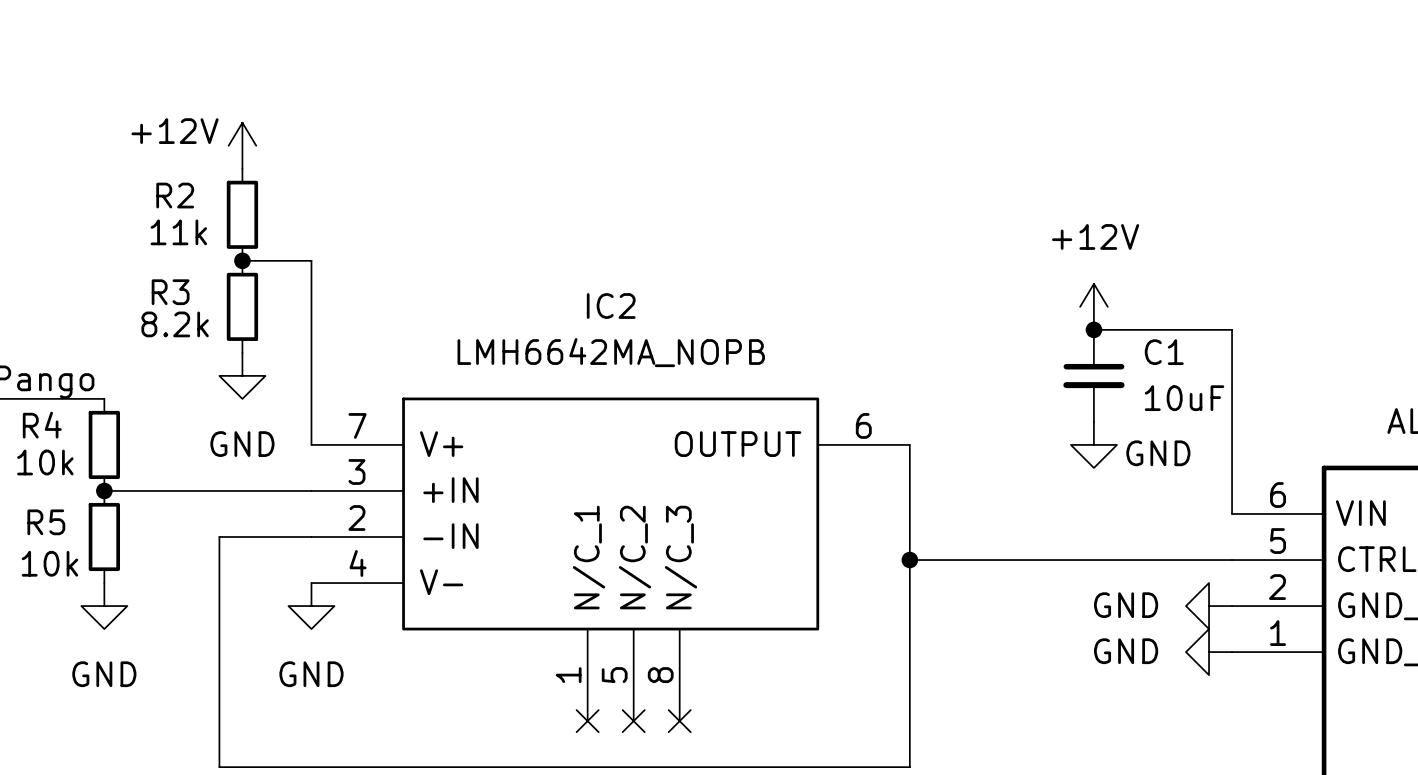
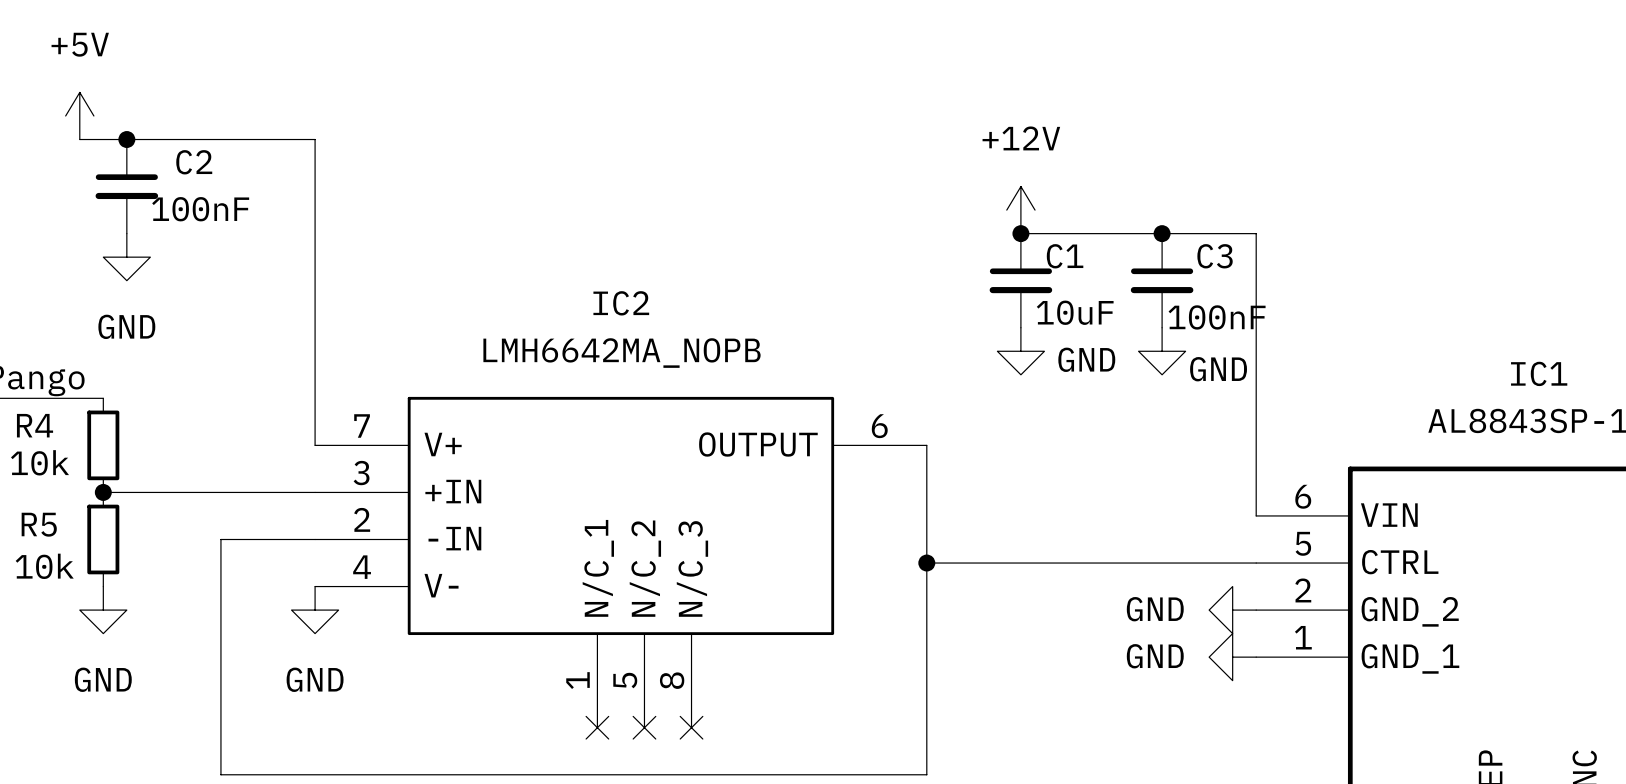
power symbol: none -> +5V (79, 115)
junction: none -> (126, 139)
power symbol: +12V (242, 145) -> none
C2: none -> 100nF (126, 186)
R2: 11k (242, 214) -> none
junction: none -> (1020, 233)
junction: none -> (1162, 233)
wire: (242, 260) (311, 260) -> (79, 139) (315, 139) (315, 257)
junction: (242, 260) -> none
C3: none -> 100nF (1162, 280)
R3: 8.2k (242, 306) -> none
power symbol position: +12V (1093, 306) -> +12V (1020, 210)
wire: (1093, 329) (1232, 329) -> (1020, 233) (1256, 233) (1256, 327)
junction: (1093, 329) -> none
power symbol: none -> GND (1020, 351)
power symbol: none -> GND (1162, 351)
C1 name position: C1 (1164, 352) -> C1 (1065, 256)
power symbol position: GND (242, 375) -> GND (126, 257)
C1 position: (1093, 375) -> (1020, 280)
C1 value position: 10uF (1184, 398) -> 10uF (1075, 312)
power symbol: GND (1093, 444) -> none

